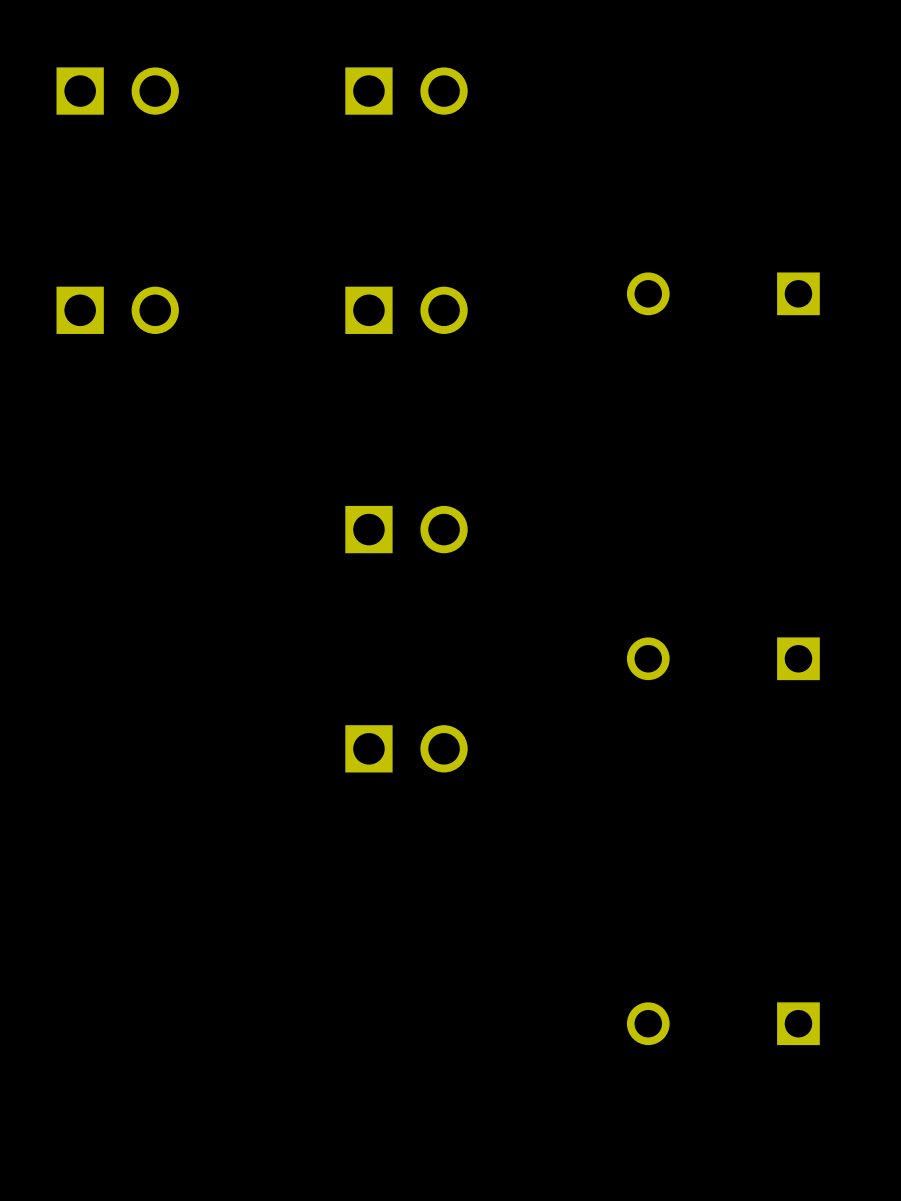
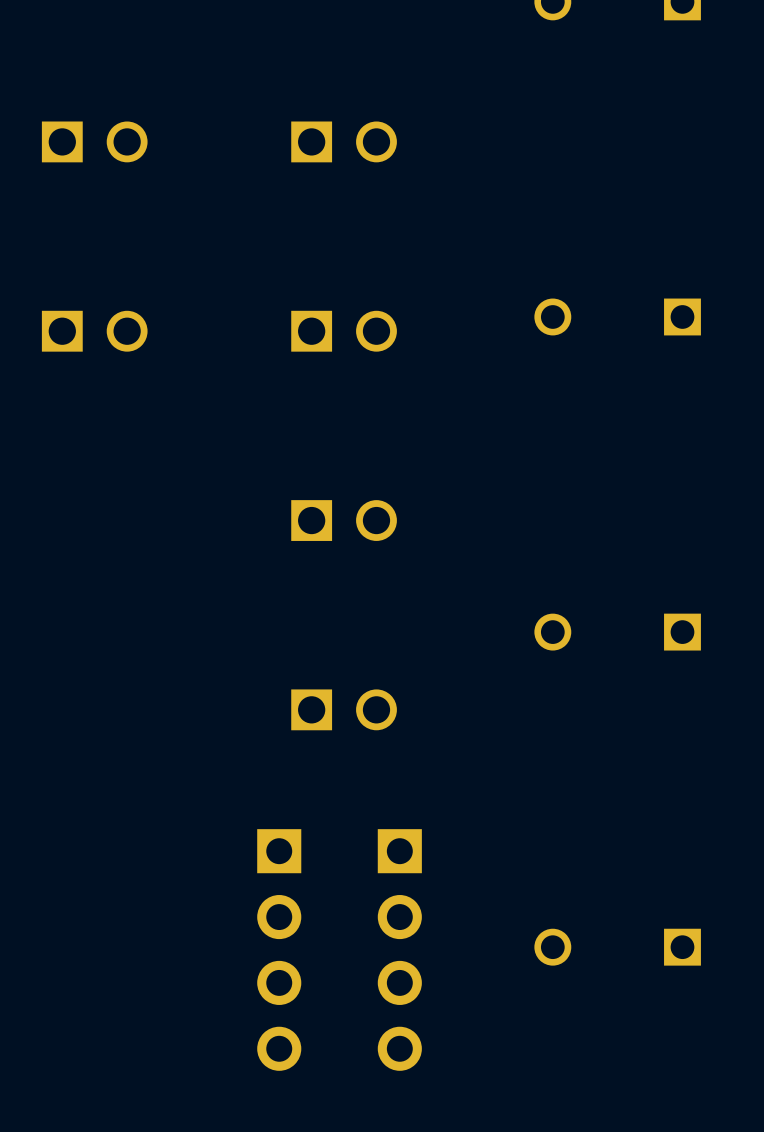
part: none -> (279, 949)
part: none -> (399, 949)

